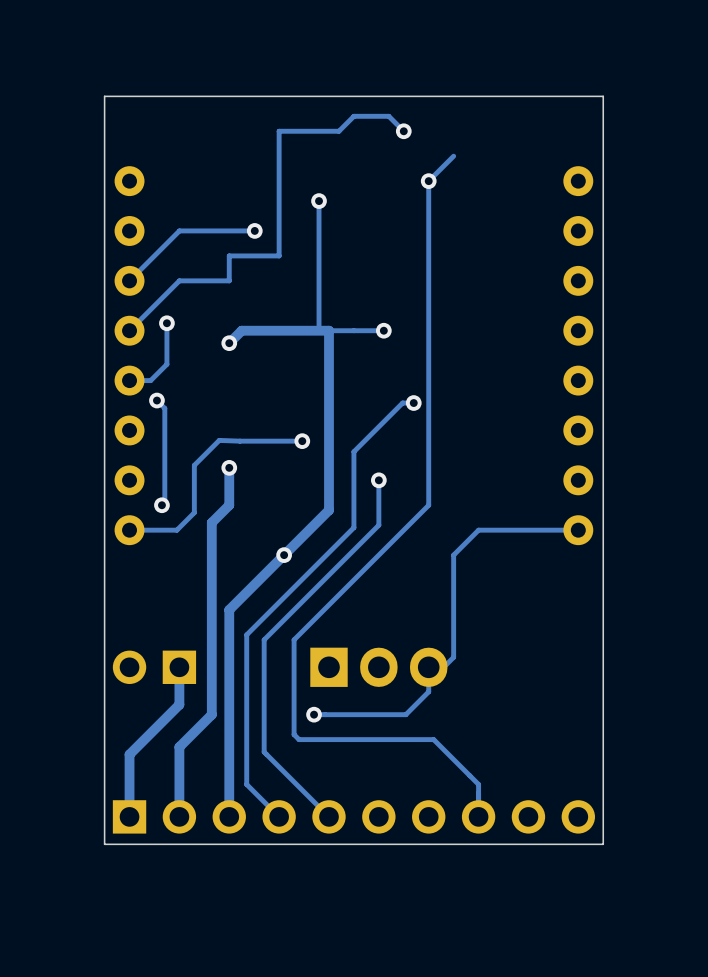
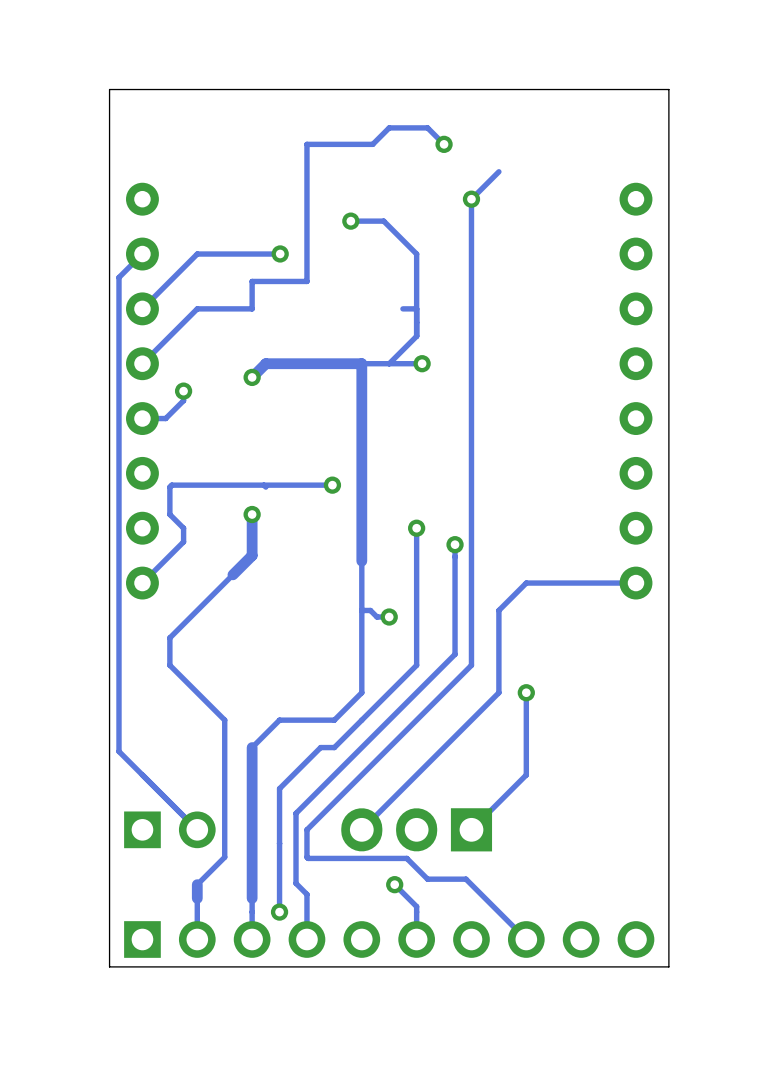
board edge: (603, 96) (603, 844) (104, 844) (104, 96) (603, 96) -> (668, 89) (668, 966) (109, 966) (109, 89) (668, 89)
track: (319, 201) (319, 328) -> (350, 221) (383, 221) (416, 254) (416, 336) (389, 363)
track: none -> (142, 254) (118, 277) (118, 751) (197, 829)
track: none -> (416, 308) (402, 308)
track: (166, 323) (166, 357) -> none
via: (166, 323) -> none
via: none -> (183, 391)
track: (156, 400) (164, 408) (164, 502) (161, 505) -> none
via: (156, 400) -> none
track: (413, 403) (402, 403) (353, 451) (353, 527) (246, 634) (246, 784) (279, 816) -> none
via: (413, 403) -> none
track: (239, 441) (219, 440) (194, 465) (194, 512) (176, 530) (129, 530) -> (265, 487) (263, 485) (171, 485) (169, 487) (169, 514) (183, 528) (183, 541) (142, 583)
track: none -> (455, 544) (455, 654) (296, 813) (296, 883) (306, 894) (306, 939)
via: none -> (455, 544)
via: (161, 505) -> none
track: (428, 505) (294, 639) (294, 734) (299, 739) (433, 739) (478, 784) (478, 816) -> (471, 555) (471, 665) (306, 829) (306, 857) (406, 858) (427, 879) (466, 879) (526, 939)
track: (328, 510) (229, 609) -> (361, 561) (361, 692) (334, 720) (279, 720) (252, 747)
track: (211, 522) (211, 714) (179, 747) (179, 804) -> (232, 574) (169, 637) (169, 665) (224, 720) (224, 857) (197, 884)
track: (378, 525) (264, 639) (264, 752) (328, 816) -> (416, 577) (416, 665) (334, 747) (320, 747) (279, 788) (279, 912)
via position: (284, 555) -> (389, 617)
track: none -> (361, 610) (370, 610) (377, 617) (389, 617)
track: (229, 609) (229, 679) -> none
track: (453, 629) (453, 657) (443, 667) (428, 667) (428, 691) (405, 714) (314, 714) -> (498, 692) (361, 829)
track: none -> (526, 692) (526, 774) (471, 829)
via: none -> (526, 692)
part rotation: 0° (154, 667) -> 180° (169, 829)
part position: (154, 667) -> (169, 829)
track: (179, 667) (179, 704) (129, 754) (129, 816) -> none
part rotation: 0° (378, 667) -> 180° (416, 829)
part position: (378, 667) -> (416, 829)
via: (314, 714) -> none
track: none -> (394, 884) (416, 906) (416, 939)
via: none -> (394, 884)
track: none -> (197, 898) (197, 939)
track: none -> (252, 898) (252, 939)
part position: (353, 816) -> (389, 939)
via: none -> (279, 912)

